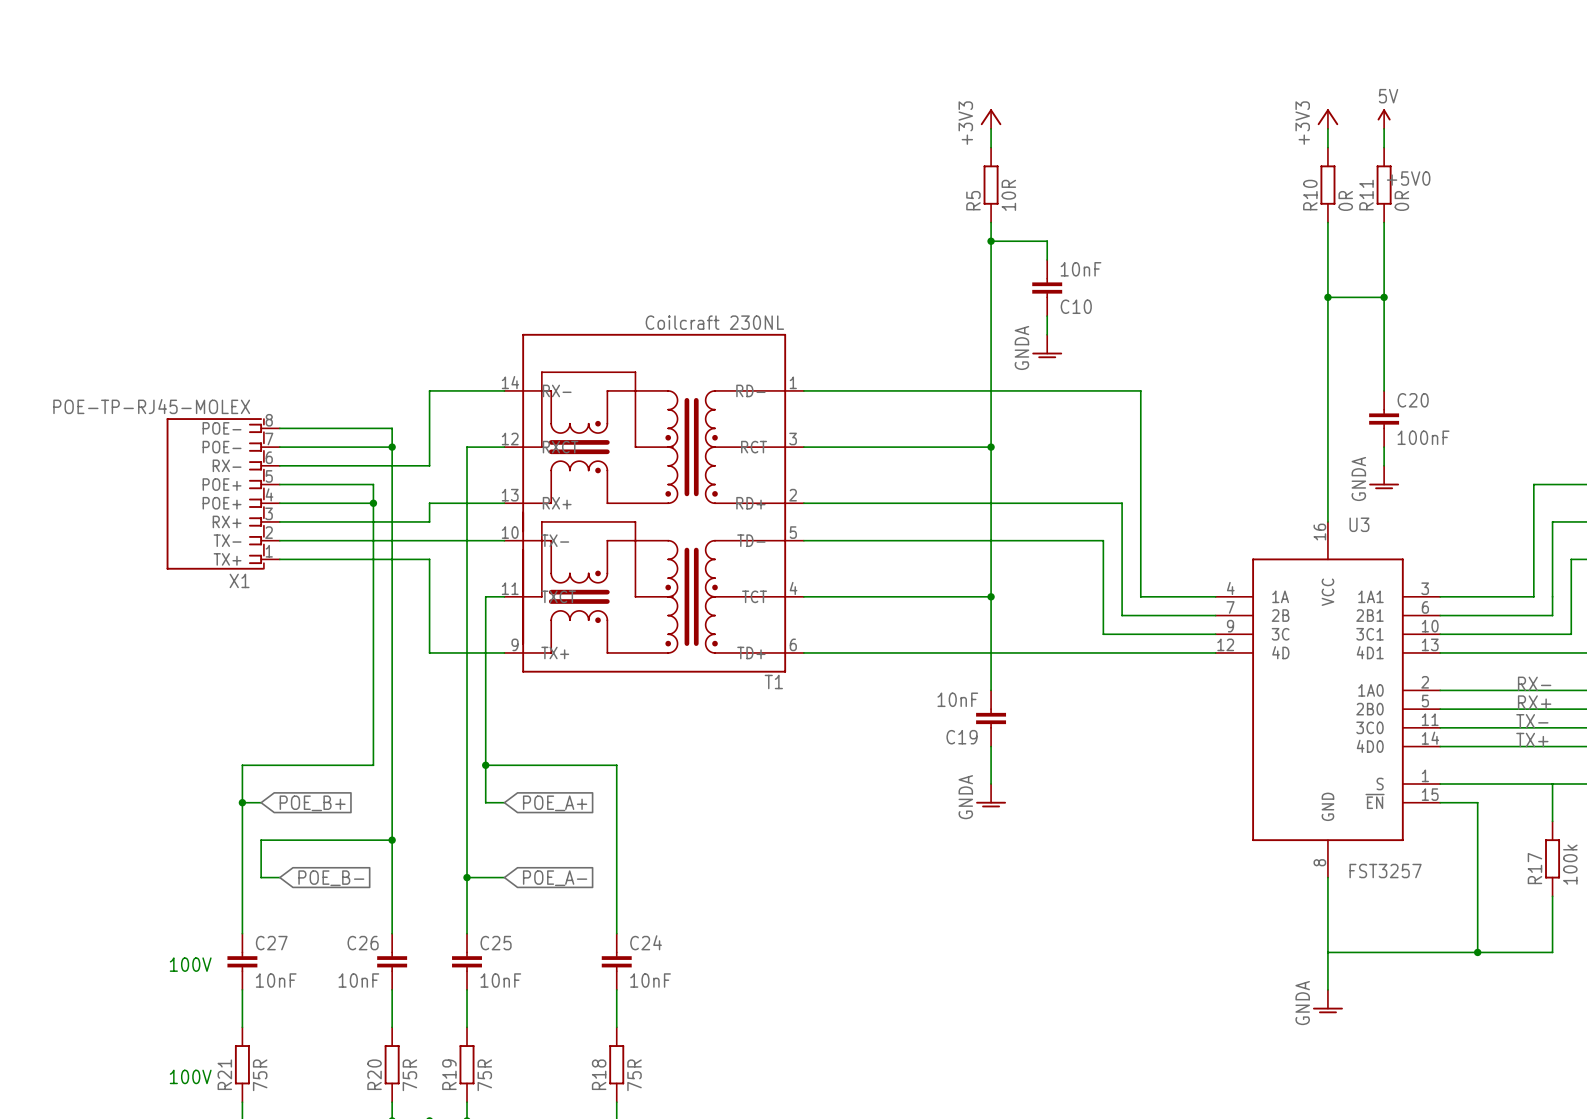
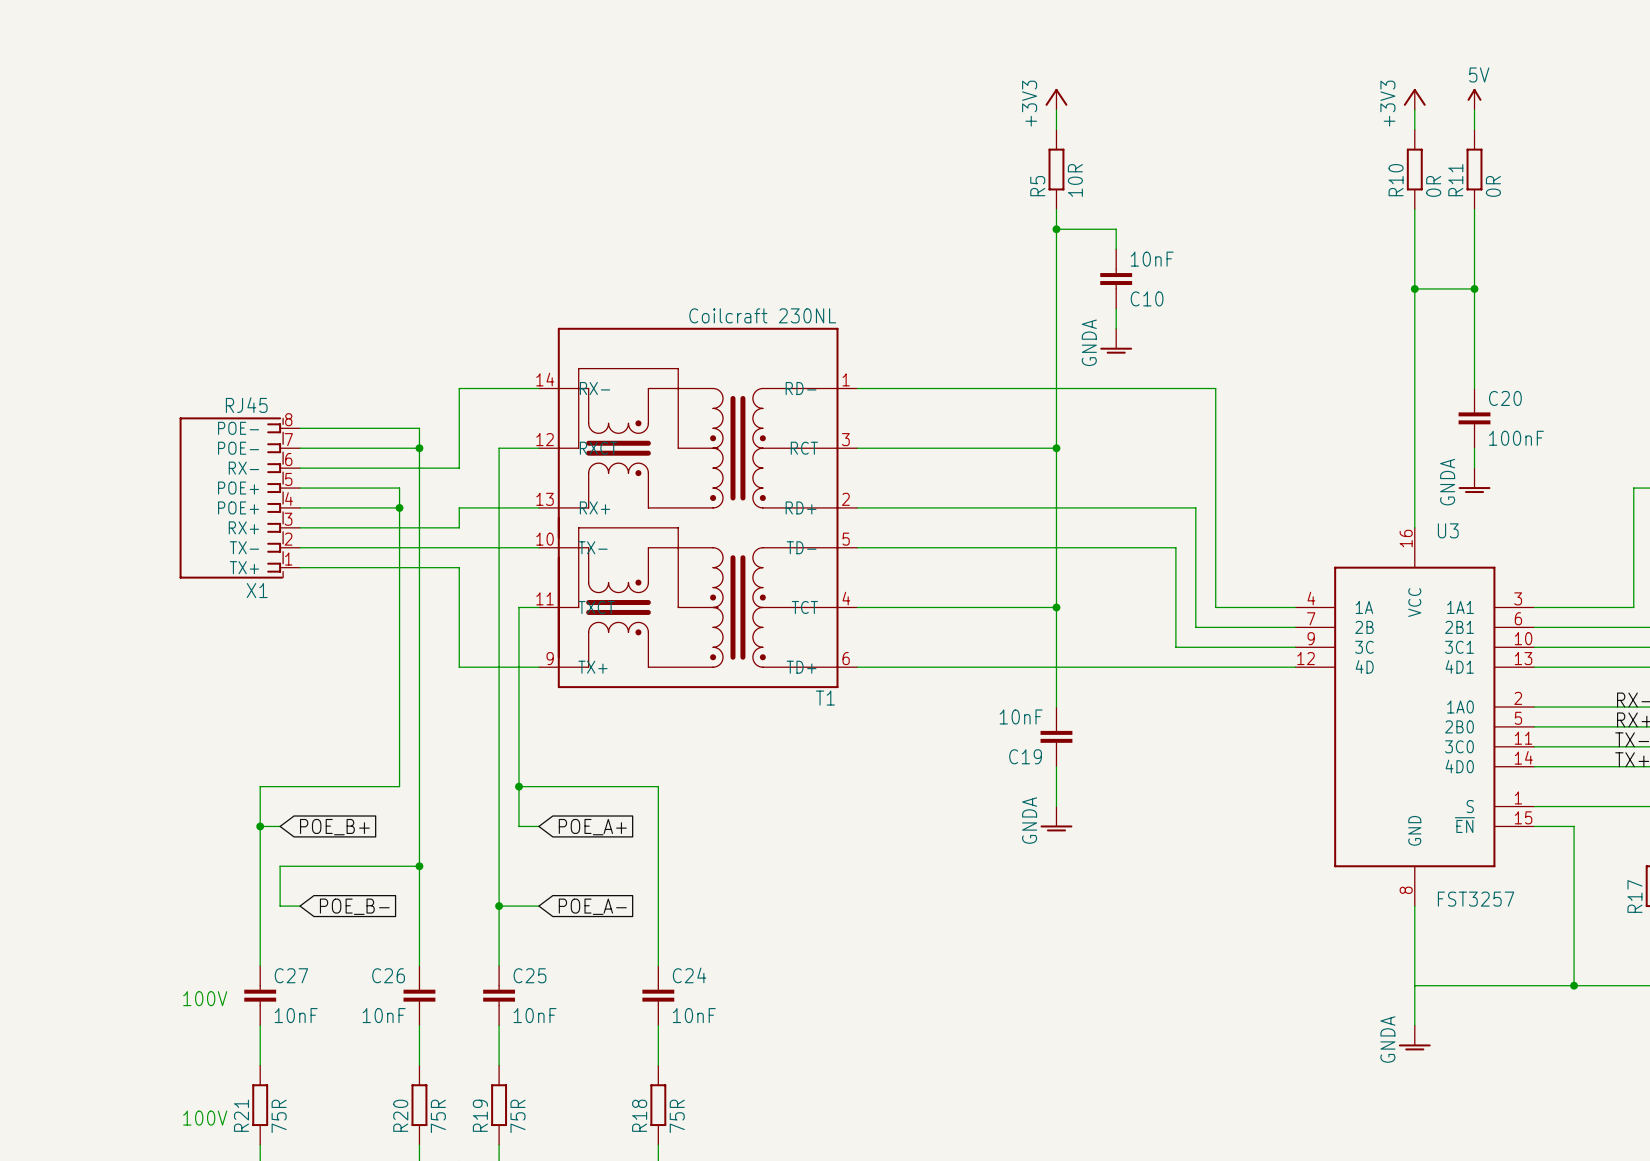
label: +5V0 (1408, 178) -> none
X1 value: POE-TP-RJ45-MOLEX (151, 406) -> RJ45 (246, 405)

